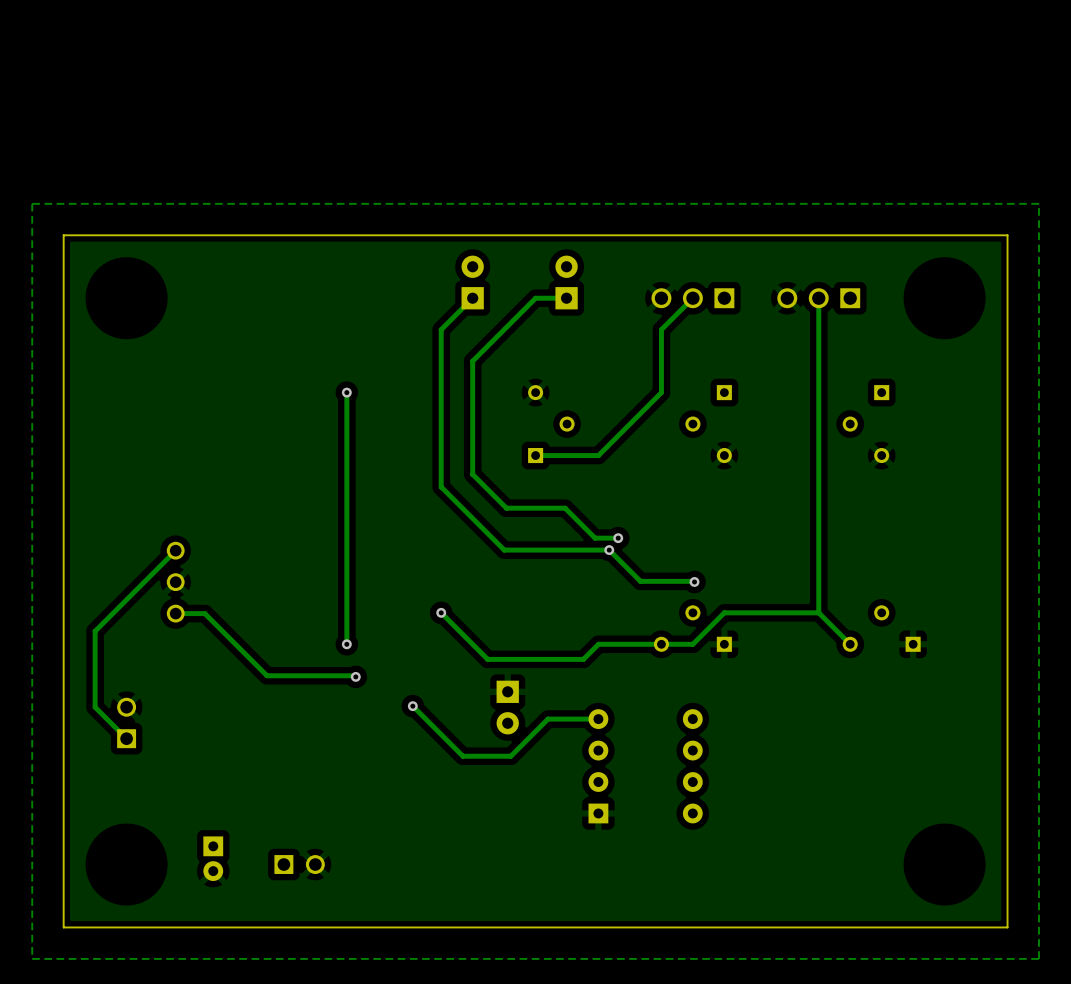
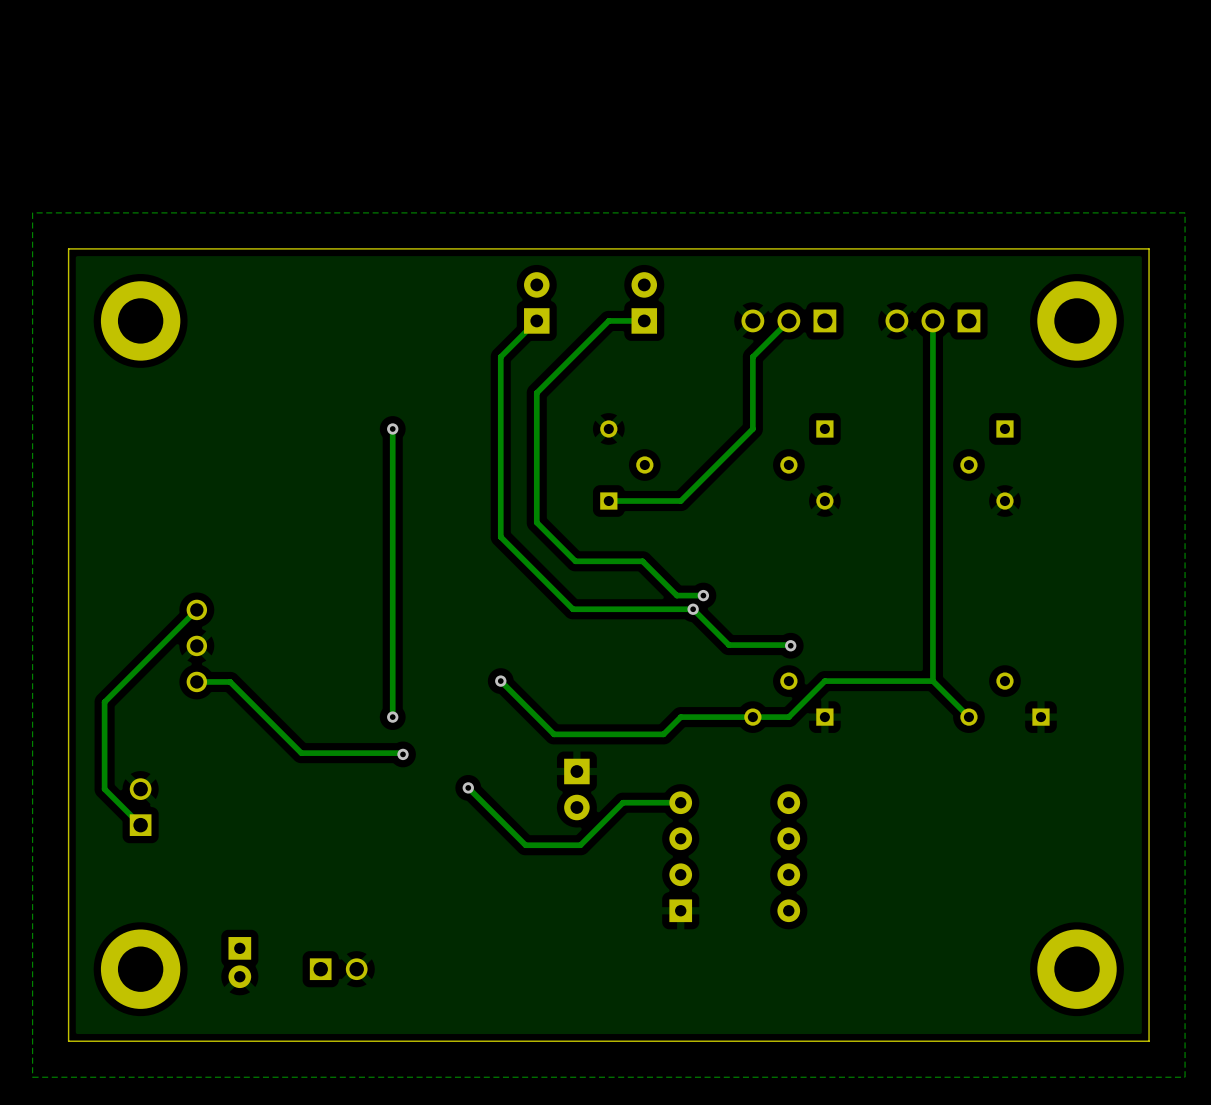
part: none -> (140, 320)
part: none -> (1077, 320)
part: none -> (140, 969)
part: none -> (1077, 969)

